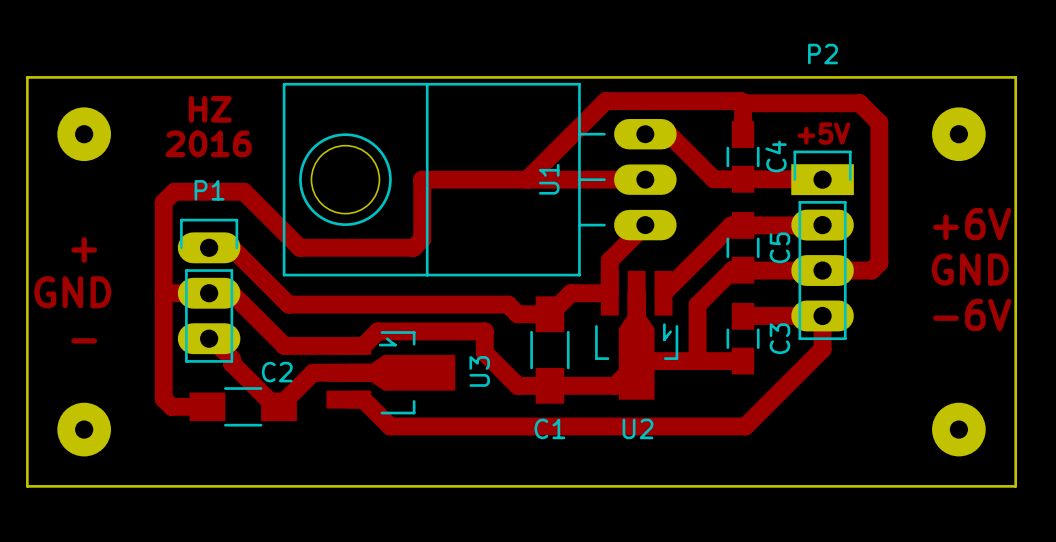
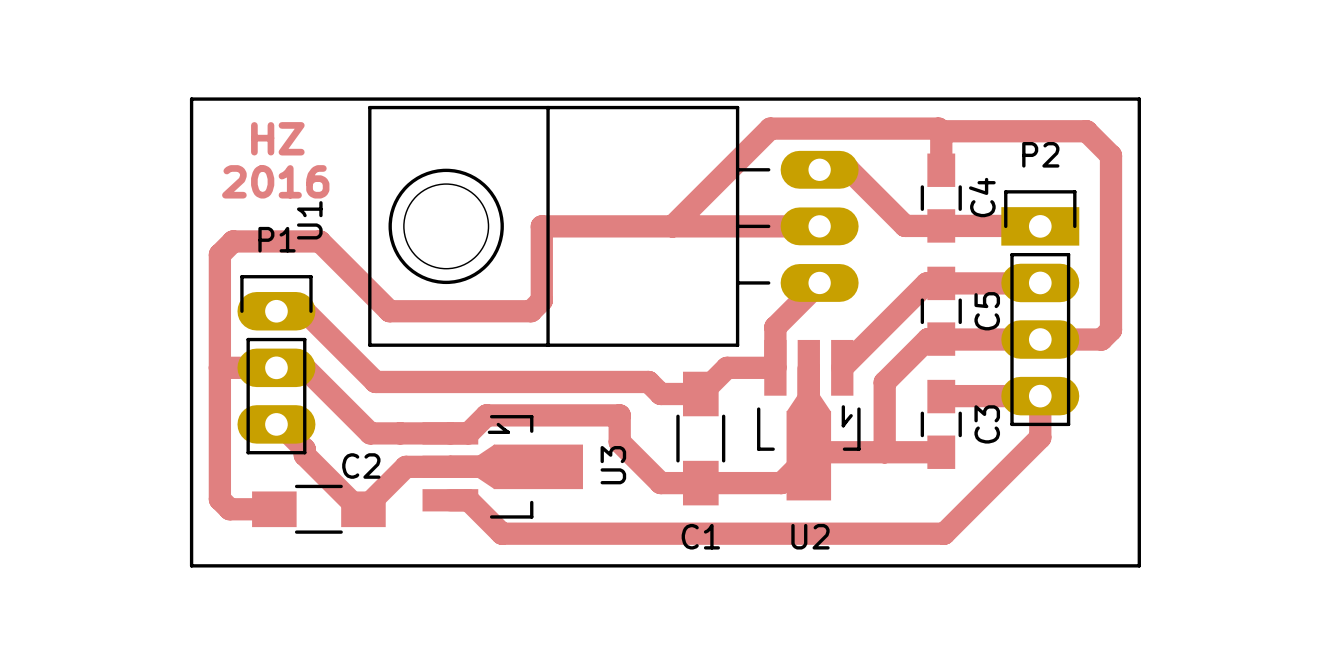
P2 name position: P2 (822, 54) -> P2 (1040, 154)
board edge: (140, 77) (27, 77) (27, 486) (1015, 486) (1015, 77) (902, 77) -> (191, 99) (191, 565) (1139, 565) (1139, 99)
text: +5V (823, 133) -> none
part: (84, 134) -> none
part: (958, 134) -> none
U1 name position: U1 (549, 179) -> U1 (309, 220)
text: +6V (972, 224) -> none
text: + (84, 250) -> none
text: GND (970, 269) -> none
text: GND (72, 292) -> none
text: -6V (972, 314) -> none
text: - (84, 340) -> none
part: (84, 429) -> none
part: (958, 429) -> none

